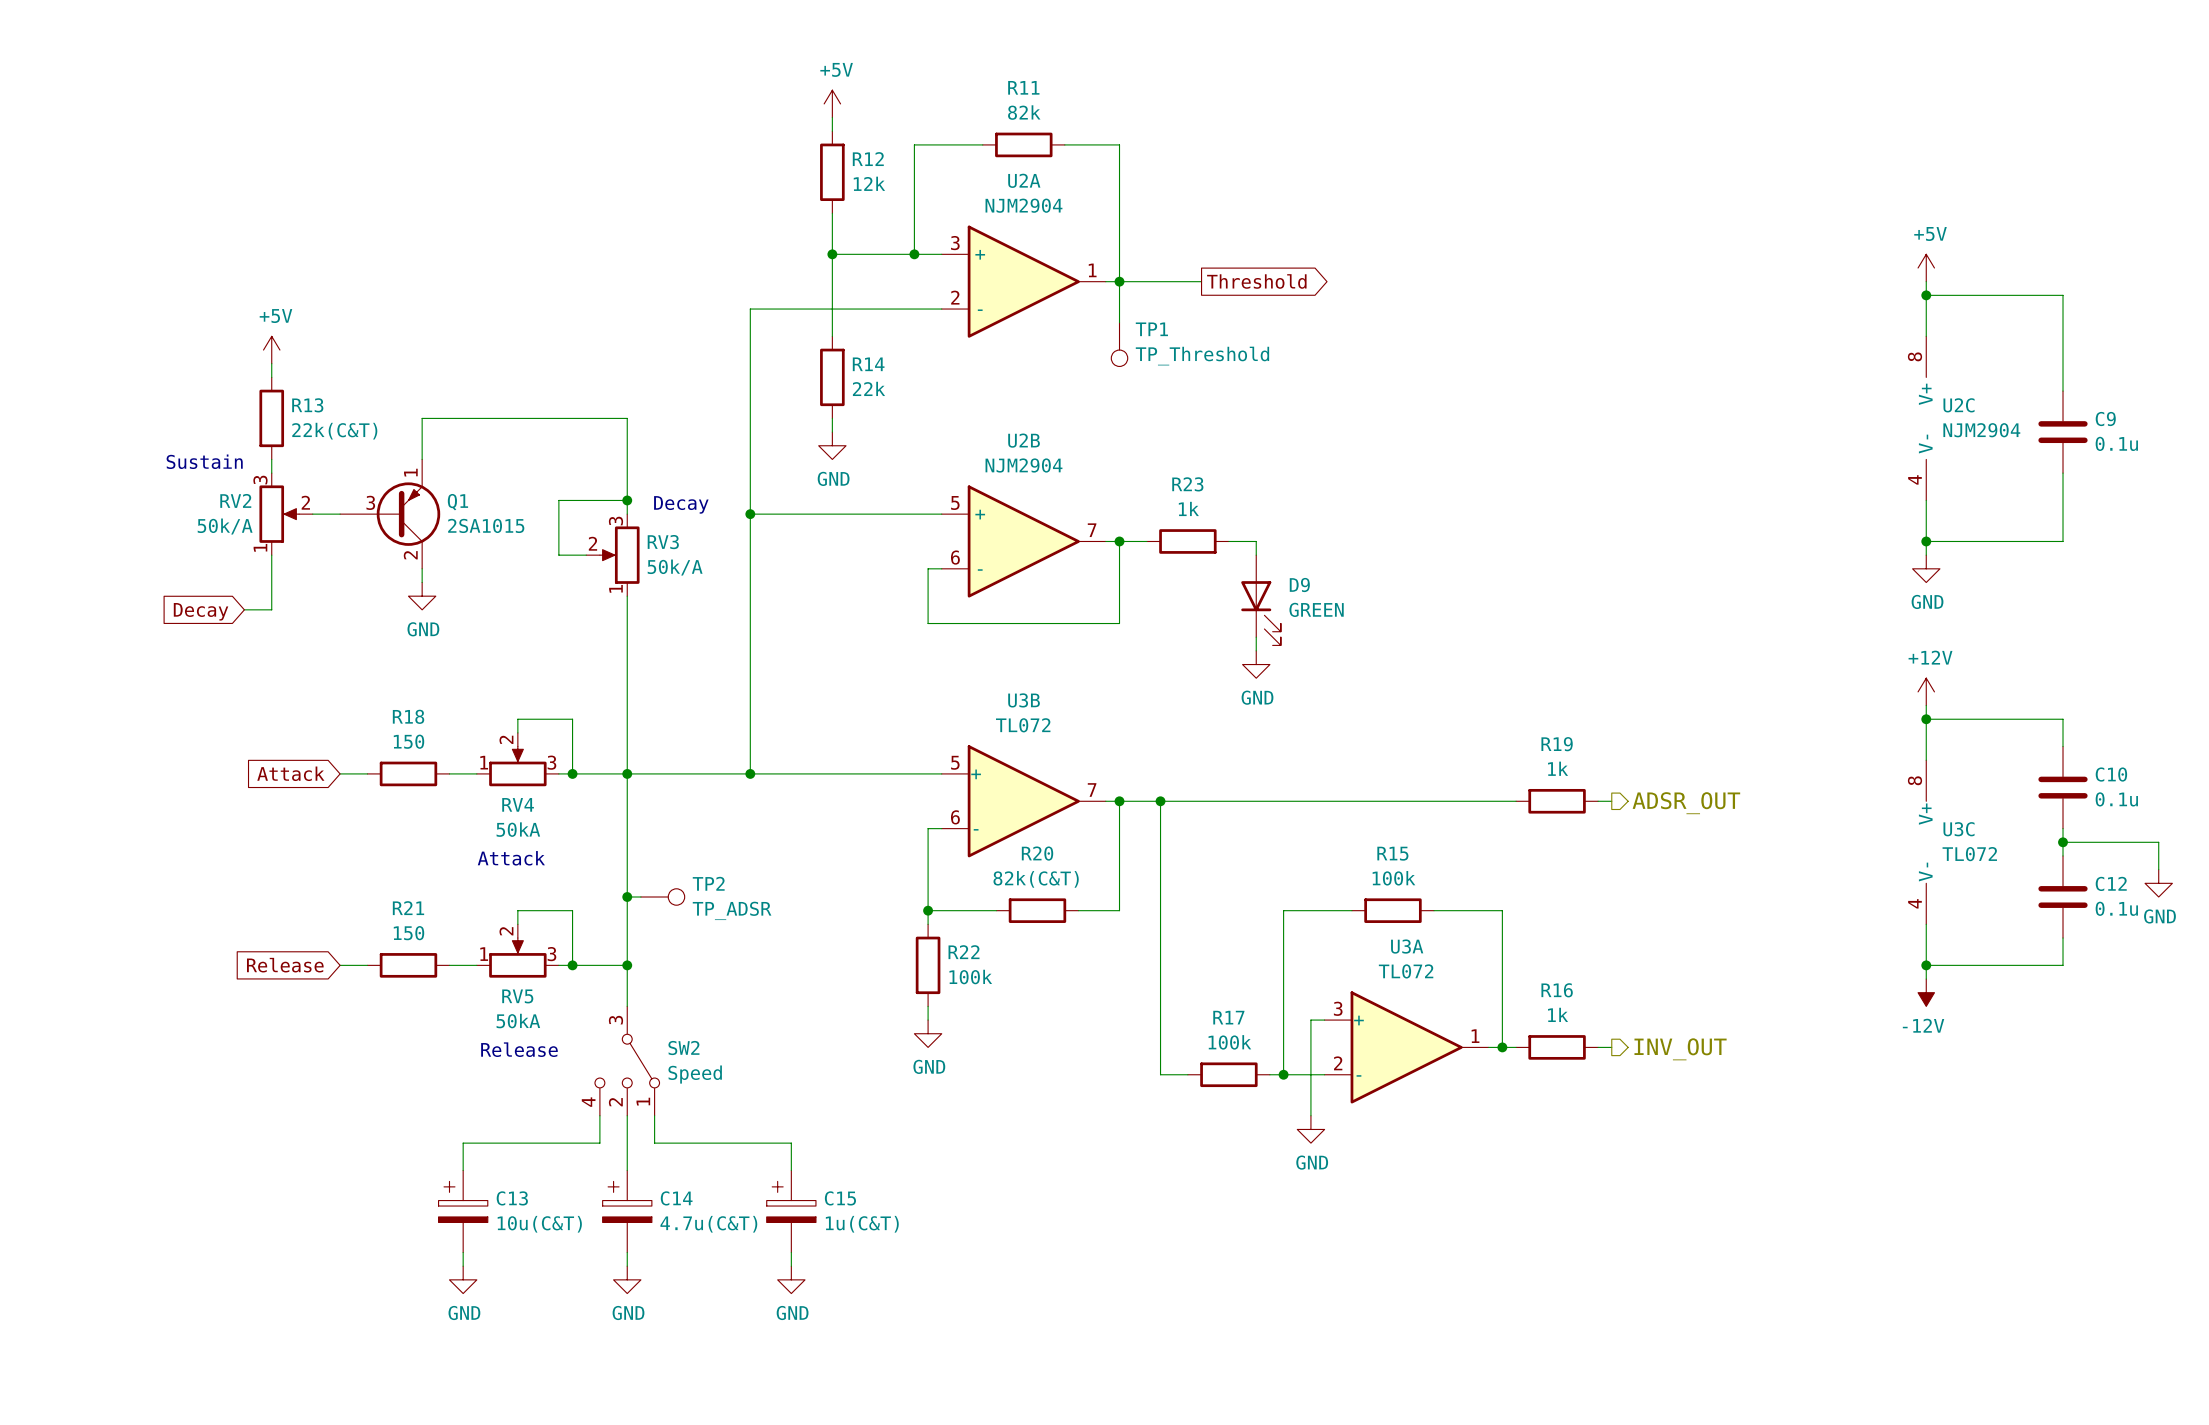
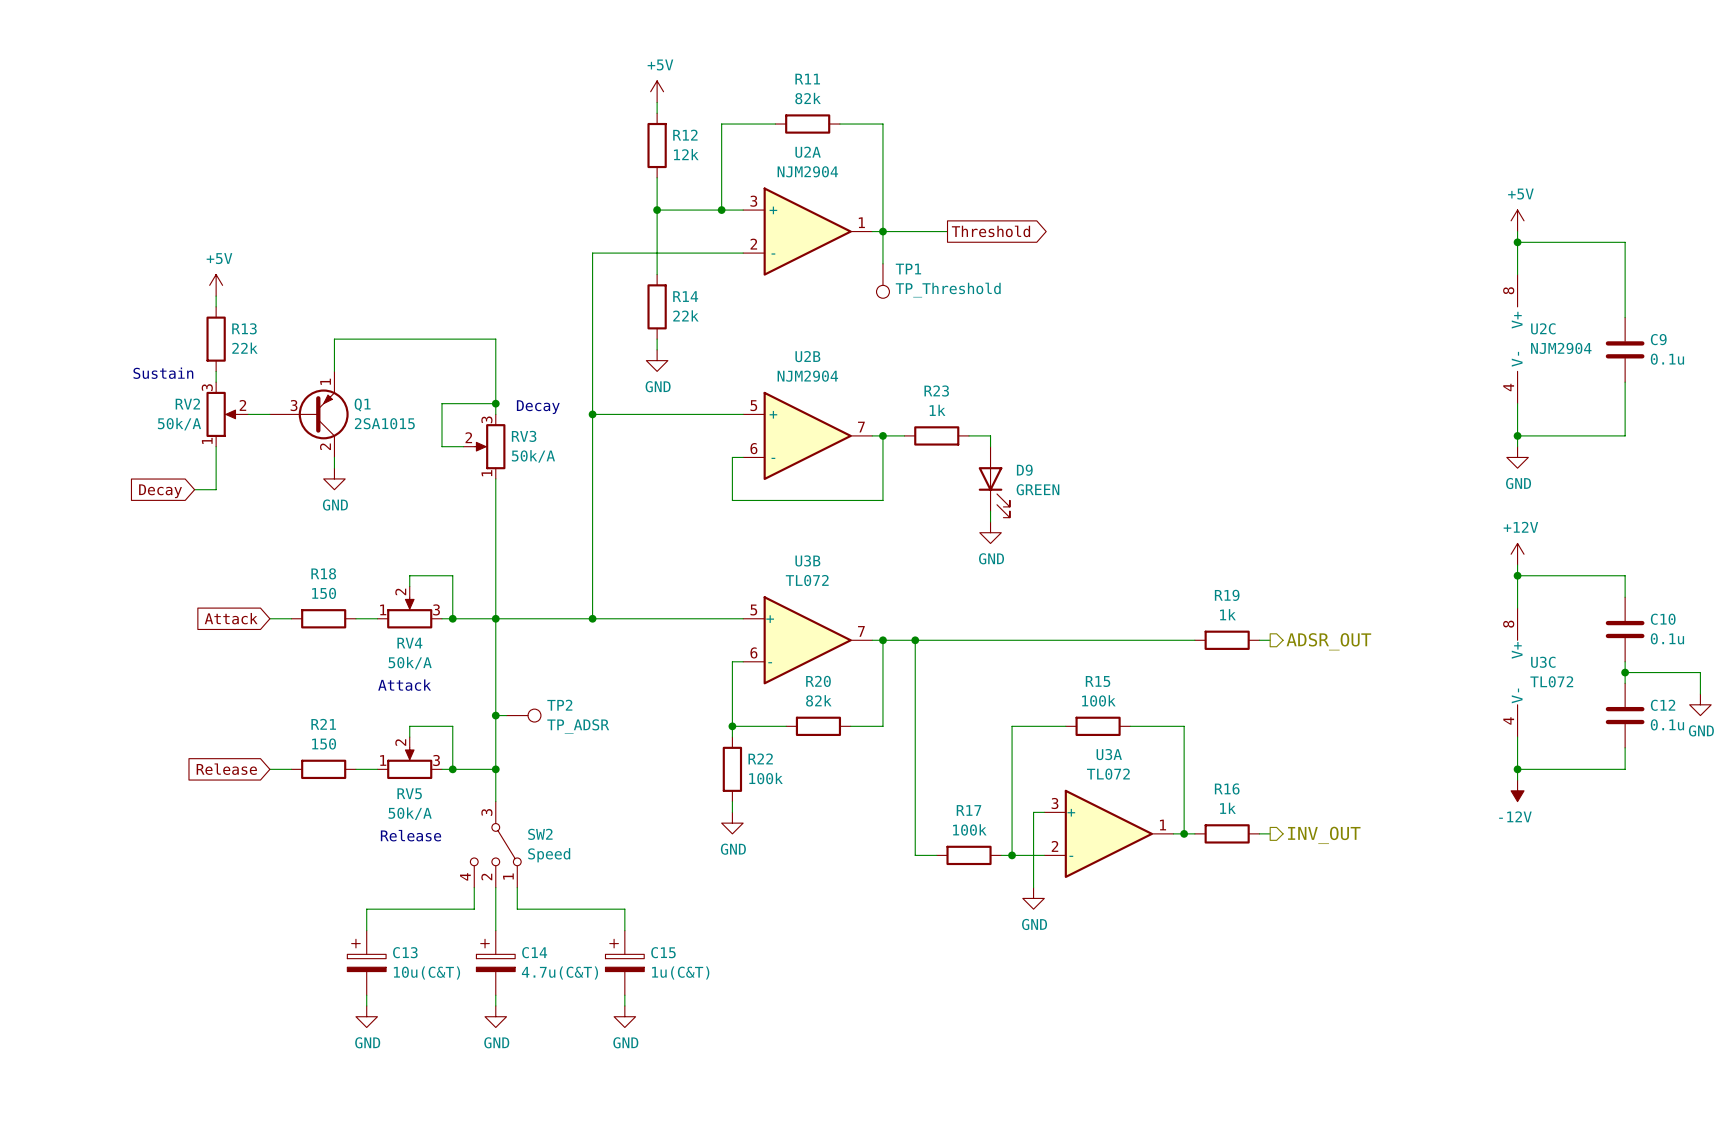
R13 value: 22k(C&T) (334, 431) -> 22k (244, 348)
RV4 value: 50kA (518, 829) -> 50k/A (410, 663)
R20 value: 82k(C&T) (1036, 879) -> 82k (818, 700)
RV5 value: 50kA (518, 1021) -> 50k/A (410, 813)

